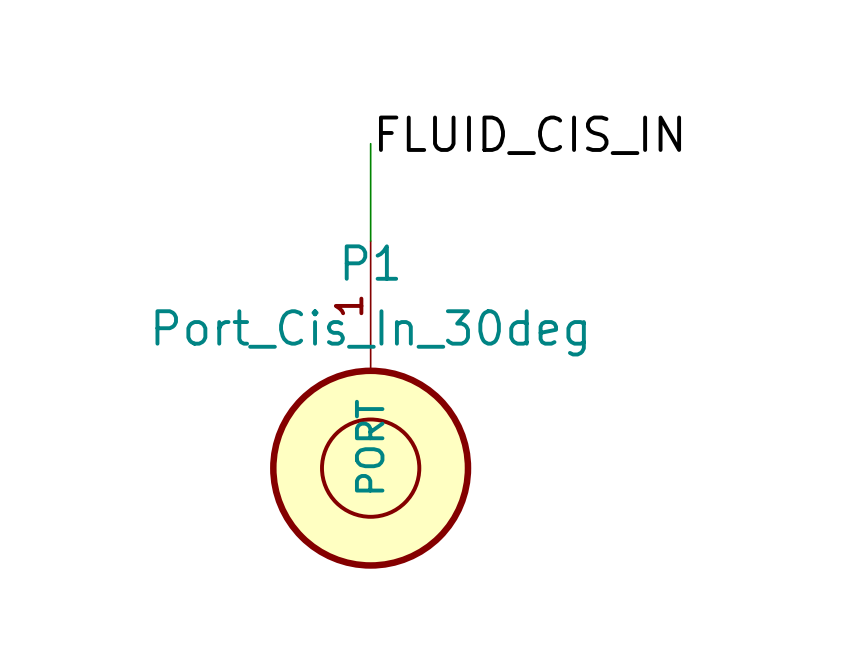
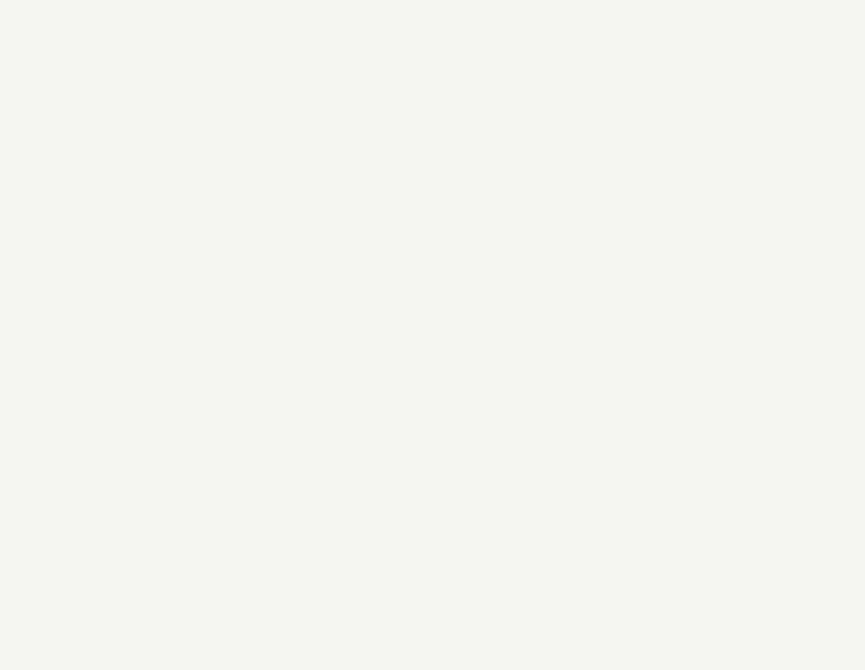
label: FLUID_CIS_IN (530, 135) -> none
wire: (370, 143) (370, 241) -> none
P1: Port_Cis_In_30deg (370, 404) -> none

